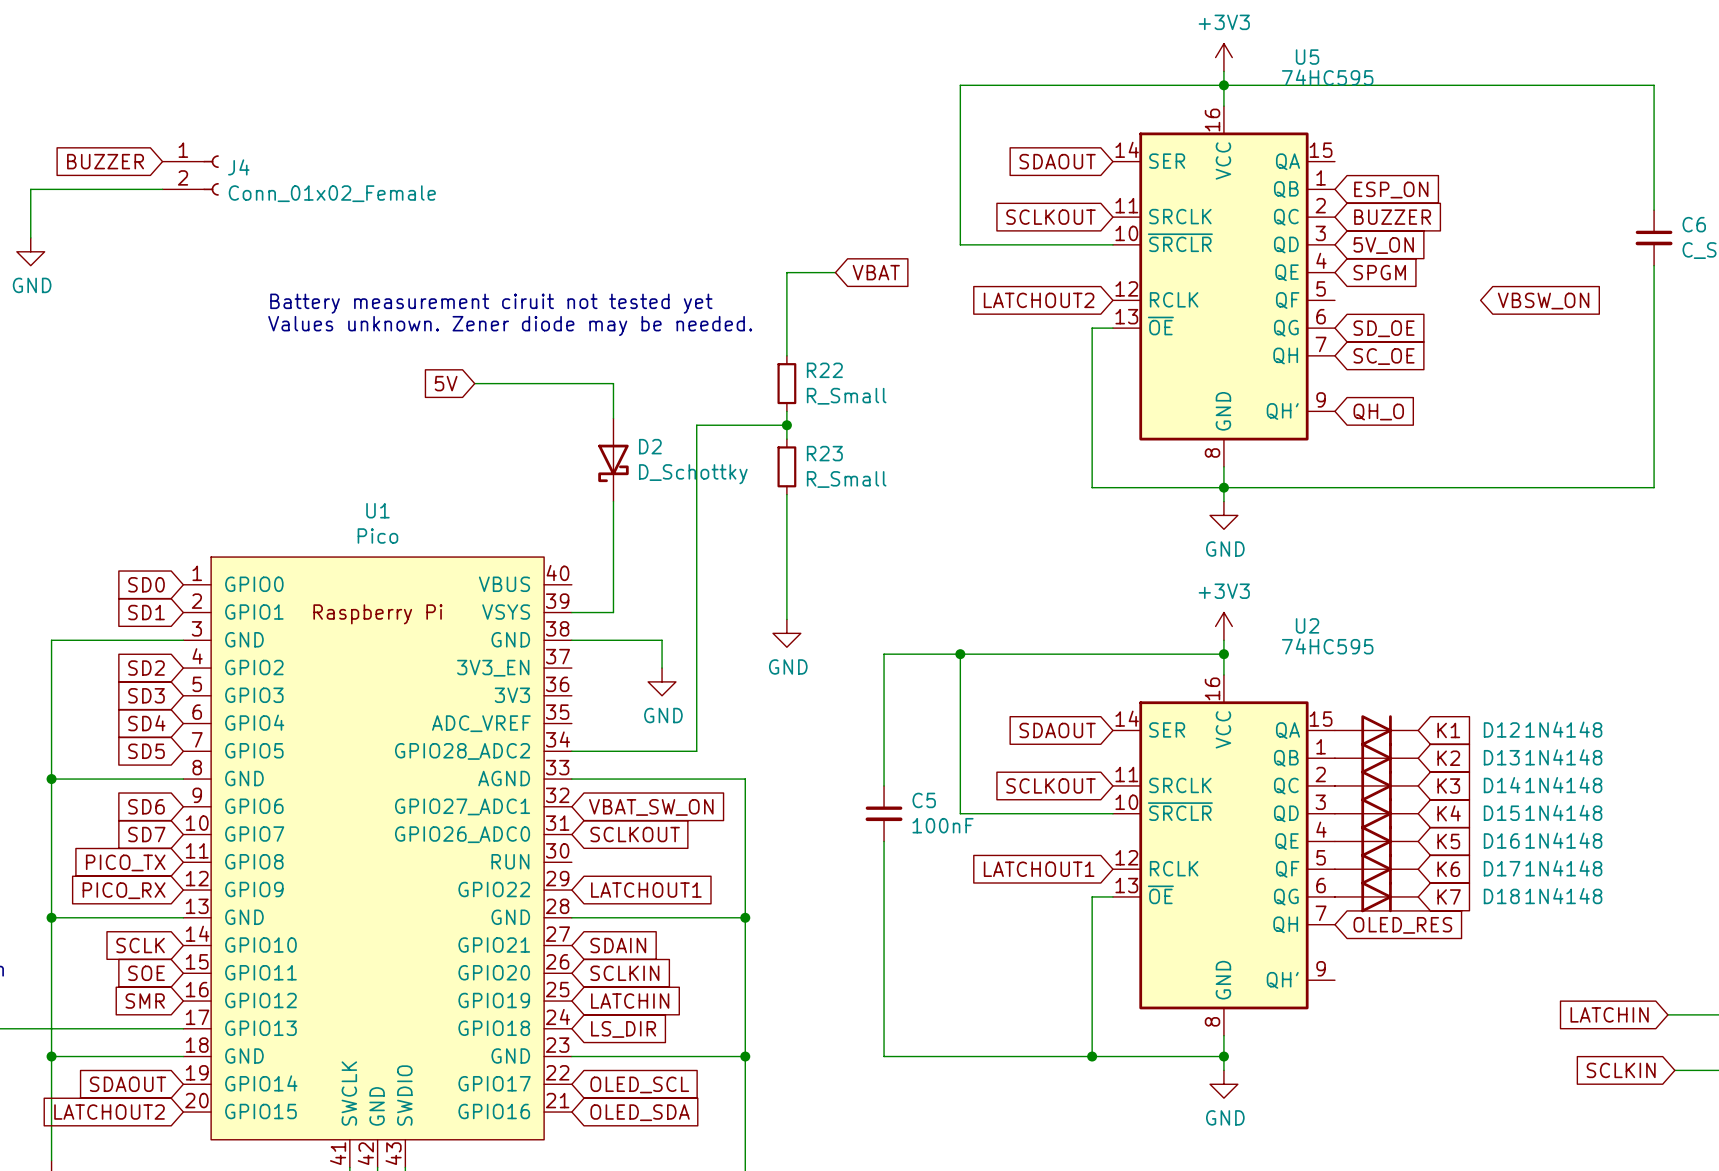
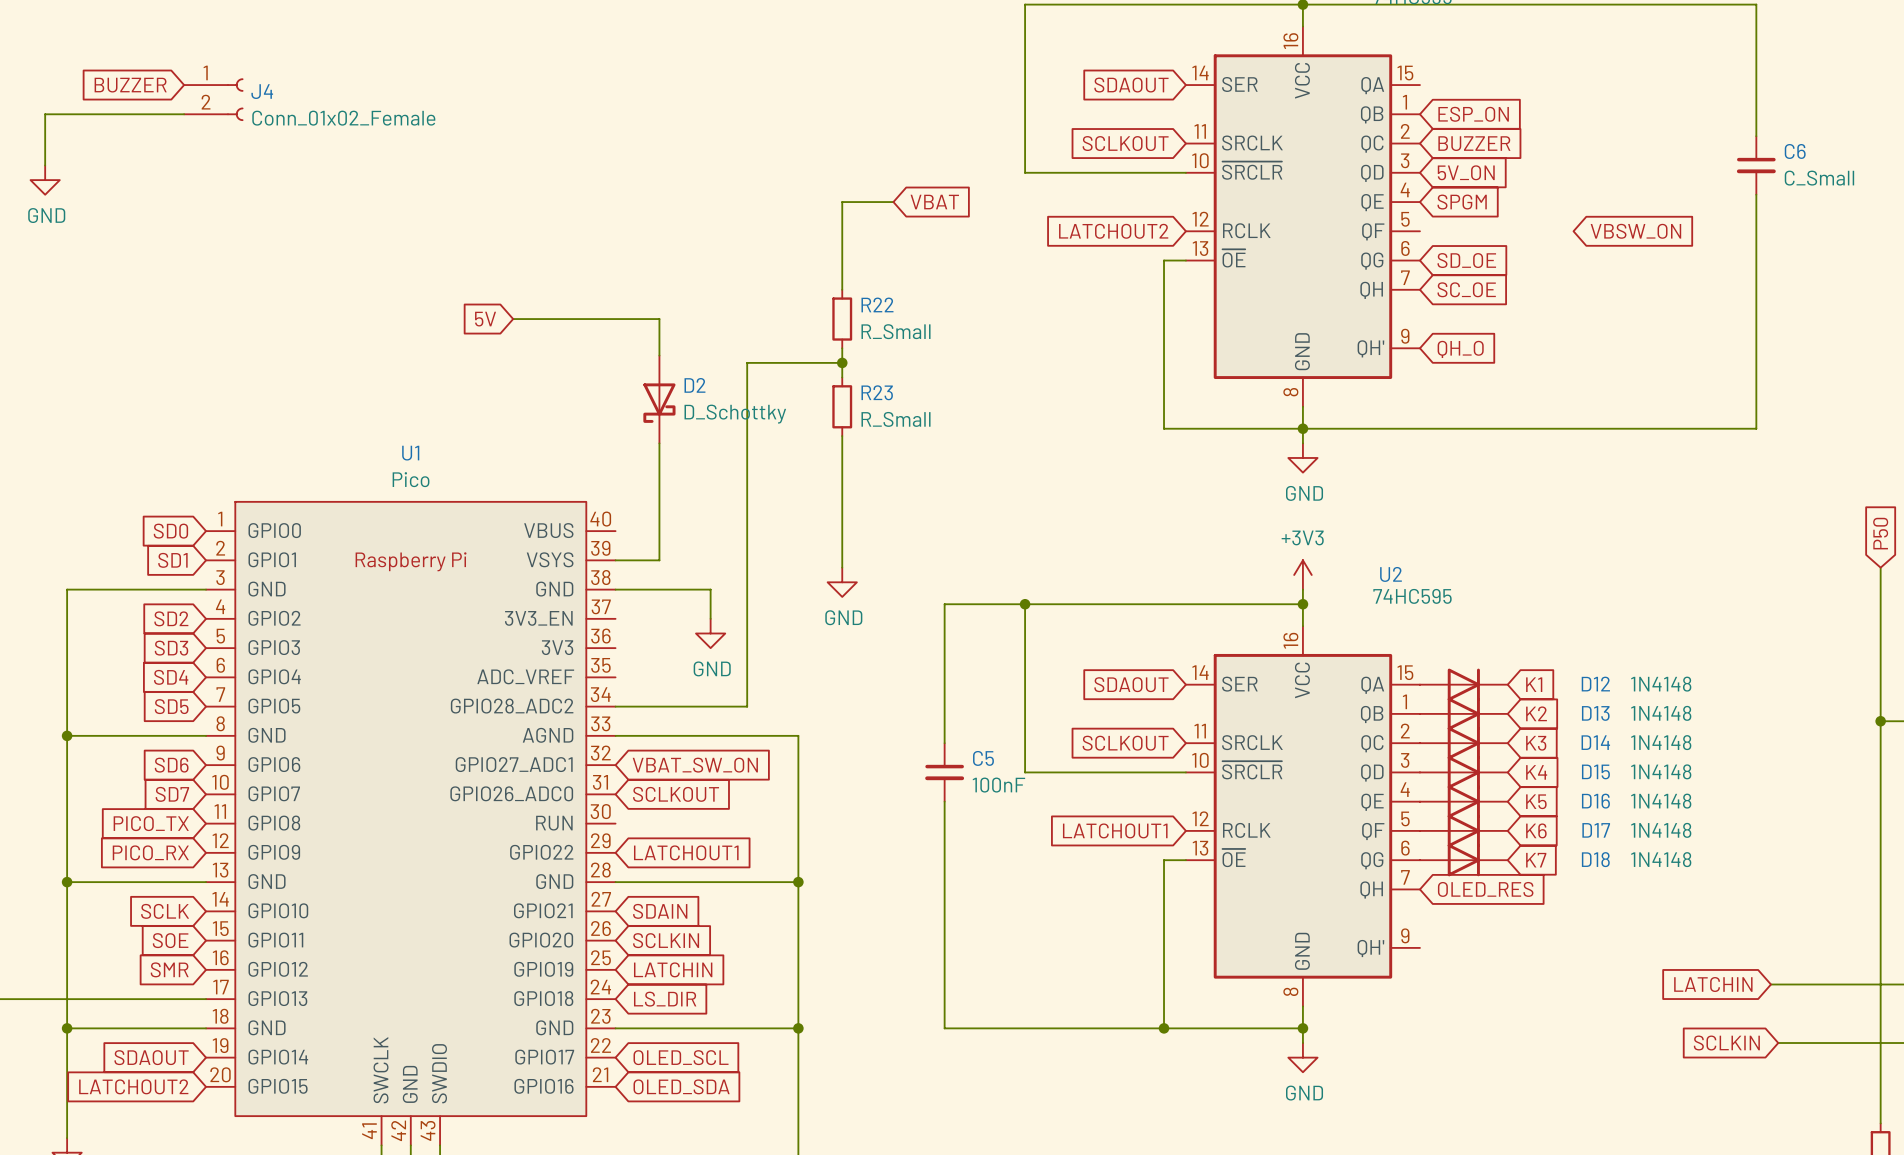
text: Battery measurement ciruit not tested yet (491, 303) -> none
text: Values unknown. Zener diode may be needed. (510, 326) -> none

